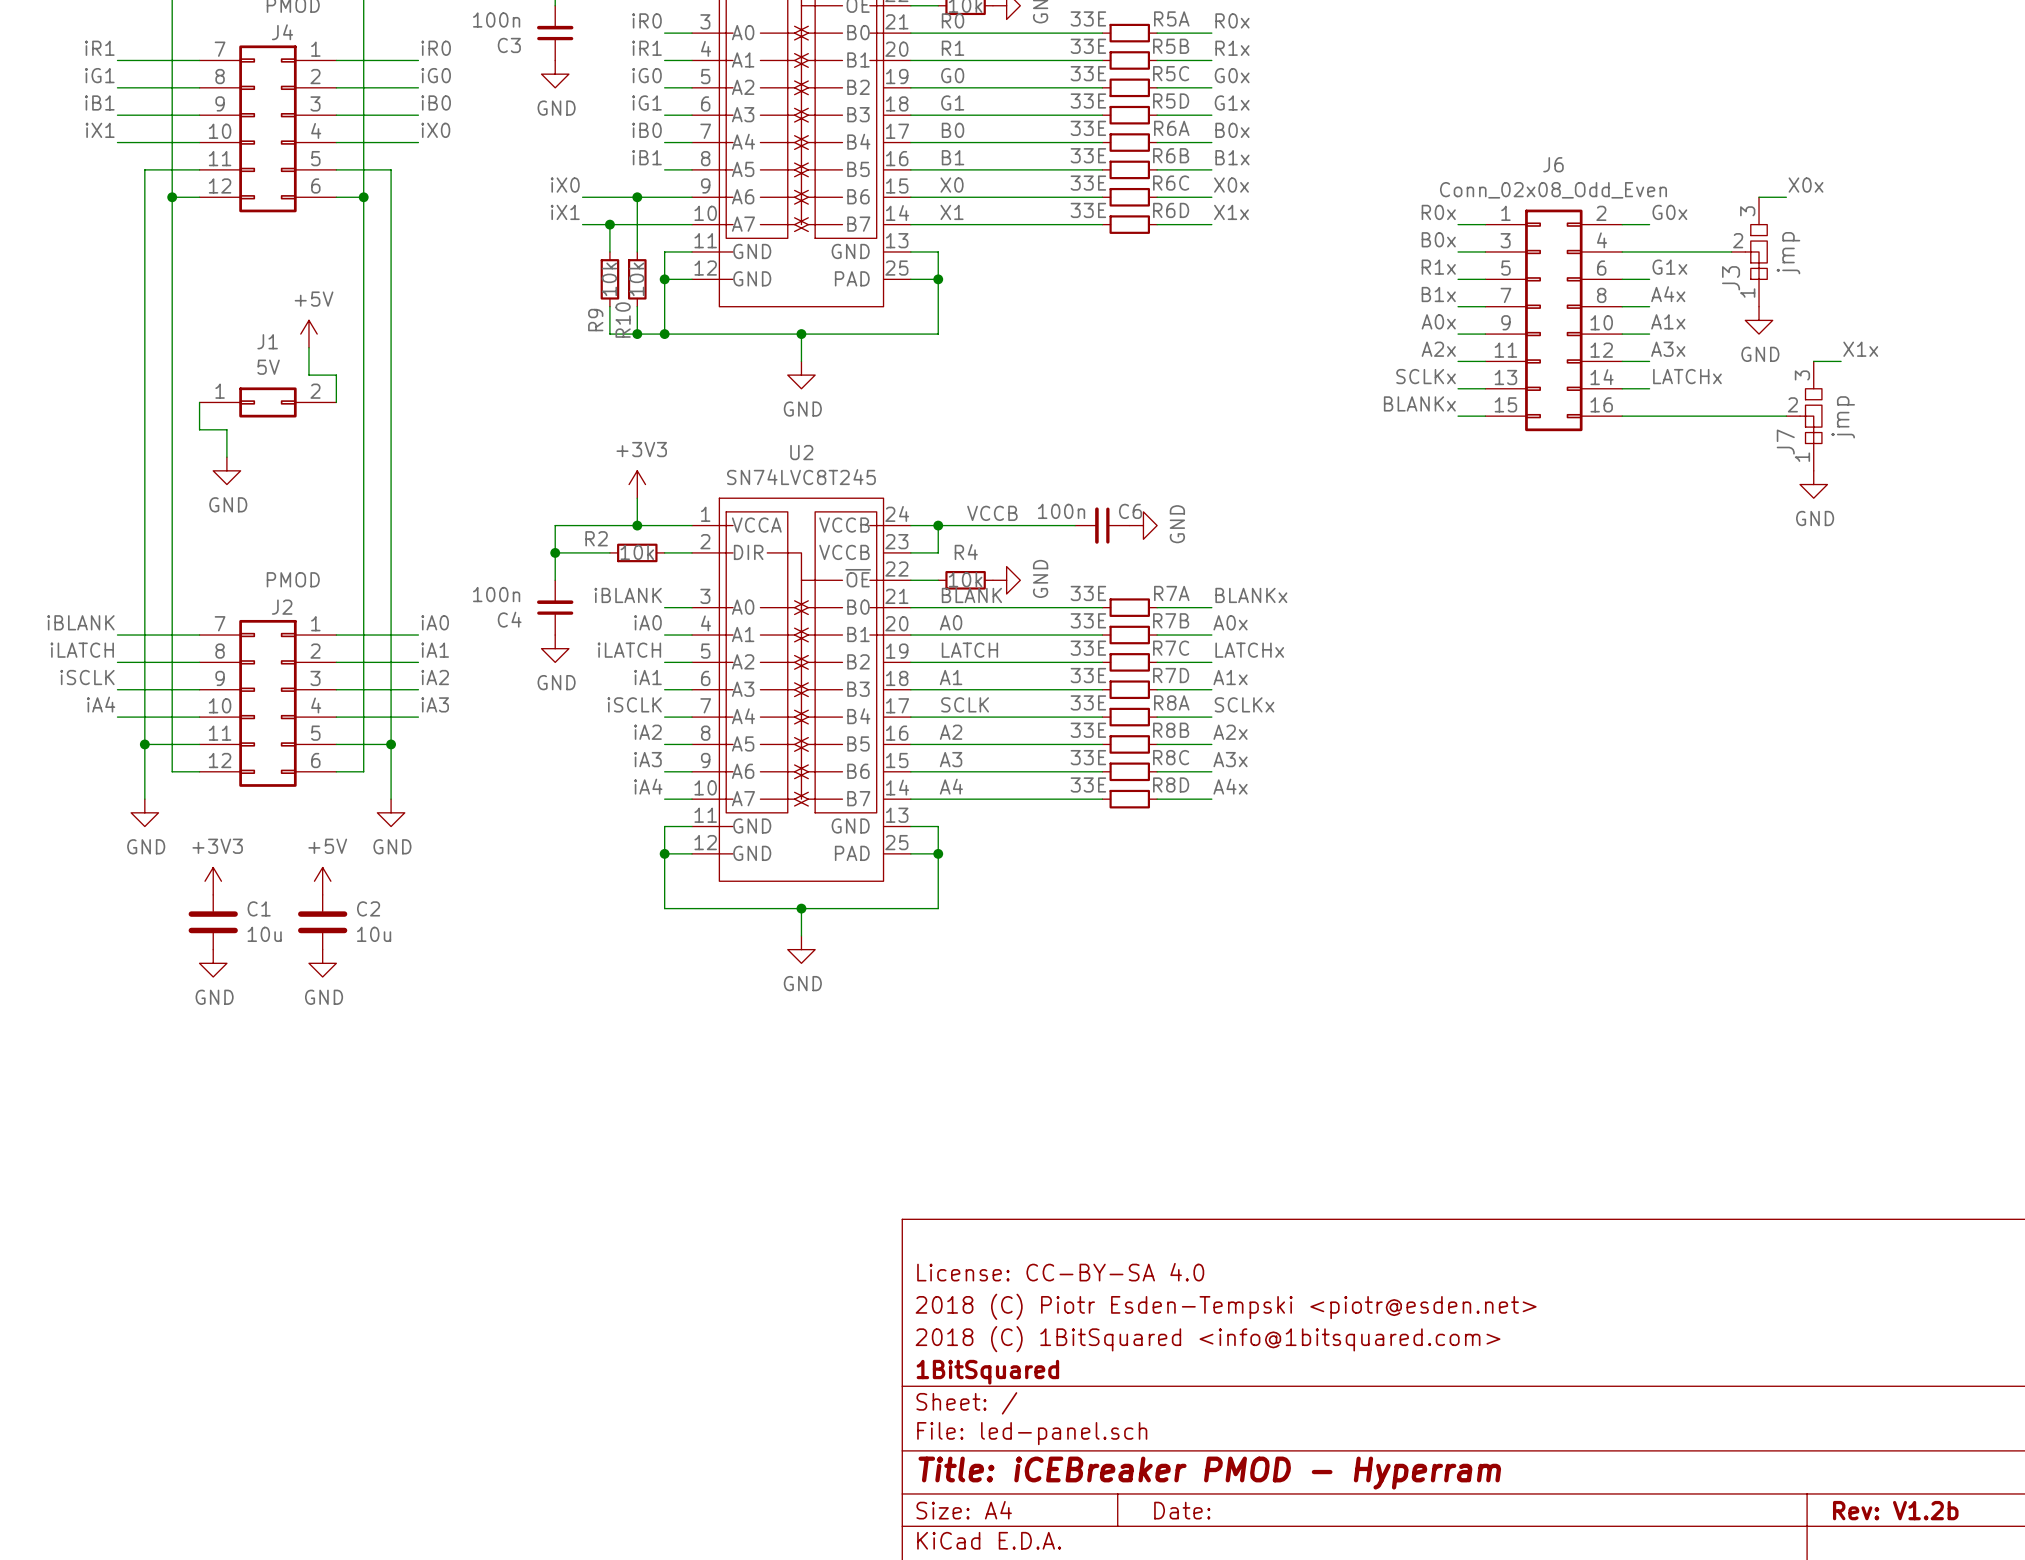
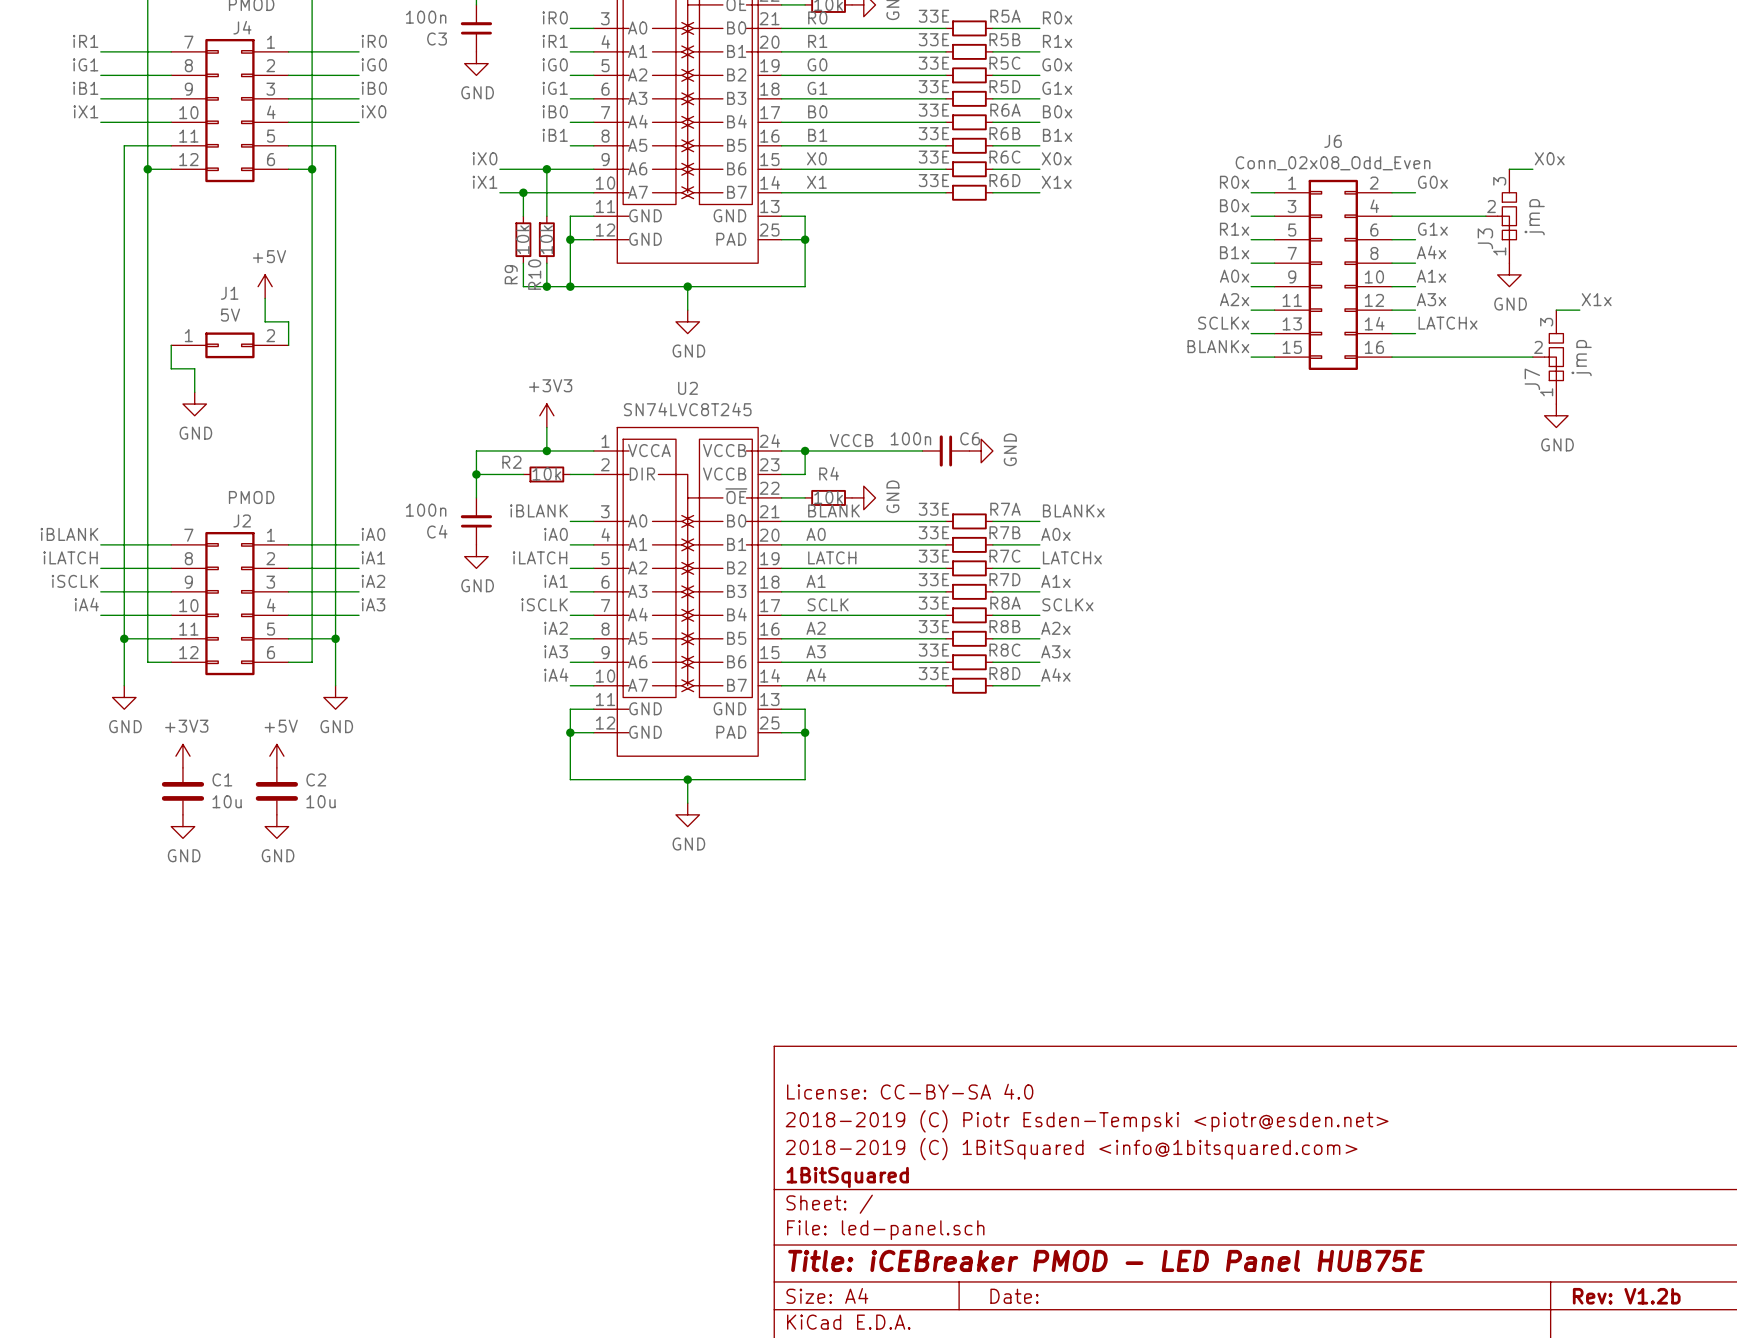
title block: 2018 (C) Piotr Esden-Tempski <piotr@esden.net> (1226, 1306) -> 2018-2019 (C) Piotr Esden-Tempski <piotr@esden.net> (1087, 1121)
title block: 2018 (C) 1BitSquared <info@1bitsquared.com> (1208, 1339) -> 2018-2019 (C) 1BitSquared <info@1bitsquared.com> (1071, 1149)
title block: Title: iCEBreaker PMOD - Hyperram (1209, 1473) -> Title: iCEBreaker PMOD - LED Panel HUB75E (1106, 1260)

